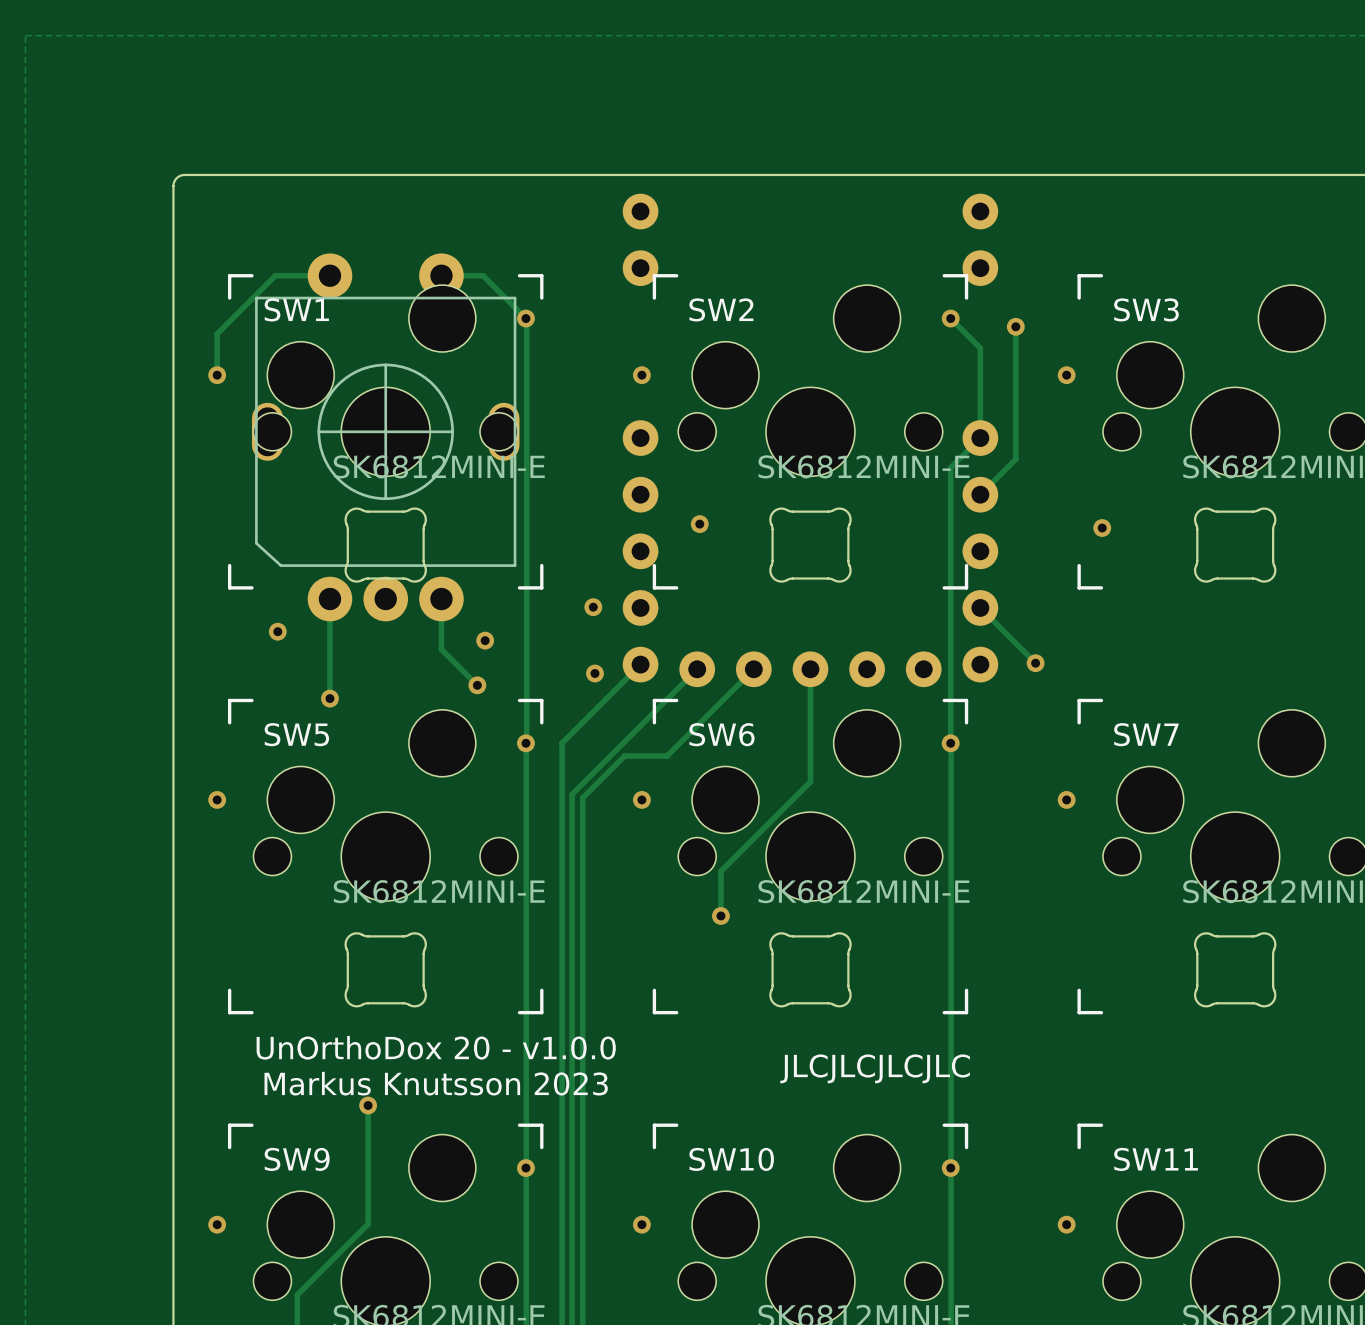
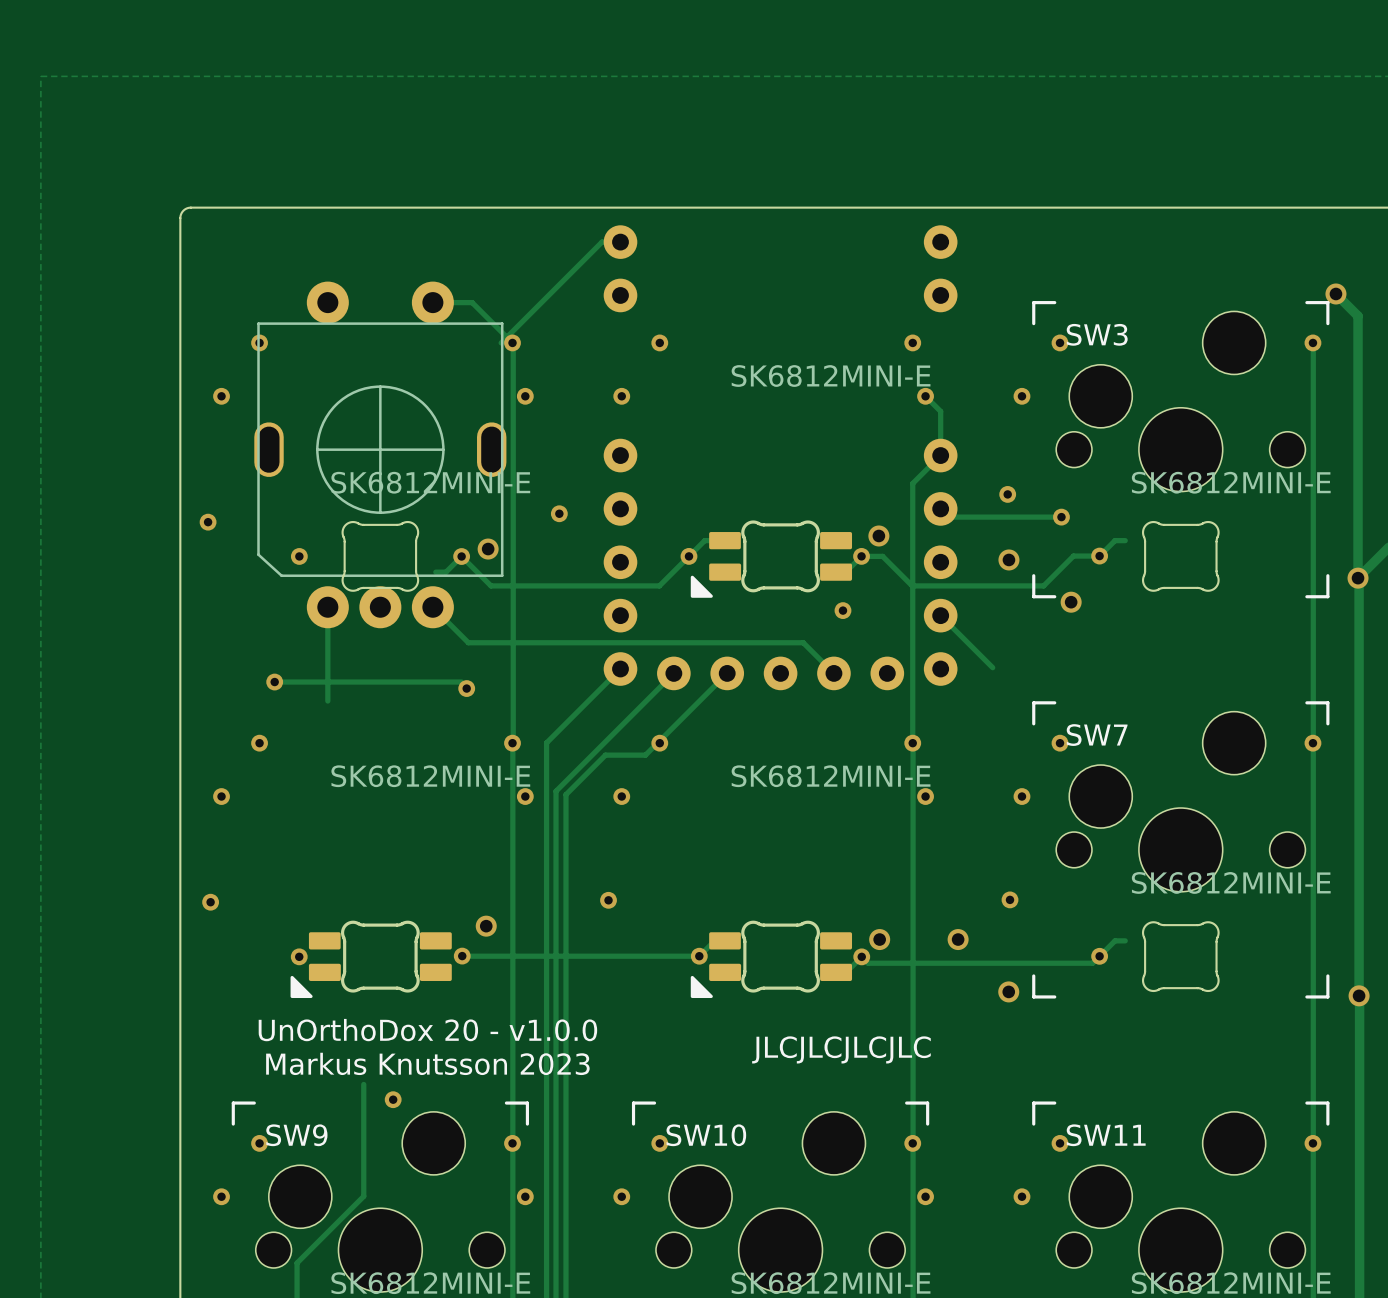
track: none -> (620, 242) (602, 242) (501, 342)
track: (329, 275) (275, 275) (217, 333) (217, 375) -> none
via: none -> (259, 342)
via: none -> (659, 342)
track: (950, 318) (980, 348) (980, 391) -> (925, 396) (940, 411)
via: none -> (1060, 342)
track: (1015, 326) (1015, 459) (980, 494) -> (1061, 517) (948, 517) (940, 508)
via: (1015, 326) -> none
via: none -> (525, 396)
via: none -> (925, 396)
SW1: (385, 431) -> none
SW2: (810, 431) -> none
part value position: SK6812MINI-E (864, 466) -> SK6812MINI-E (831, 376)
via: none -> (1007, 494)
via: none -> (559, 513)
via: none -> (1061, 517)
part footprint: [769, 507, 852, 583] -> [690, 520, 853, 598]
via: none -> (208, 522)
via: none -> (878, 535)
via position: (699, 524) -> (688, 556)
track: none -> (725, 540) (704, 540) (659, 585) (491, 585) (461, 556) (445, 572) (435, 572)
via: (1102, 528) -> none
track: none -> (1125, 540) (1115, 540) (1099, 556) (1073, 556) (1043, 585) (912, 585) (882, 556) (861, 556) (845, 572) (836, 572)
via: none -> (488, 549)
via: none -> (1099, 556)
via: none -> (299, 556)
via: none -> (461, 556)
via: none -> (861, 556)
via: none -> (1008, 559)
via: none -> (1071, 602)
track: (441, 599) (441, 649) (477, 685) -> (432, 607) (468, 642) (803, 642) (833, 673)
via: none -> (842, 610)
via: (593, 607) -> none
via: (277, 631) -> none
via: (485, 640) -> none
via: (1035, 663) -> none
track: (810, 669) (810, 781) (720, 871) (720, 915) -> none
via: (594, 673) -> none
track: none -> (274, 682) (461, 682)
via: none -> (274, 682)
via: (329, 698) -> none
via: none -> (259, 743)
via: none -> (659, 743)
via: none -> (1060, 743)
via: none -> (525, 796)
via: none -> (925, 796)
SW5: (385, 856) -> none
SW6: (810, 856) -> none
part value position: SK6812MINI-E (439, 891) -> SK6812MINI-E (430, 776)
part value position: SK6812MINI-E (864, 891) -> SK6812MINI-E (831, 776)
via: none -> (1010, 899)
via: none -> (608, 900)
via: none -> (210, 902)
via: (720, 915) -> none
part footprint: [344, 932, 427, 1008] -> [290, 920, 452, 999]
part footprint: [769, 932, 852, 1008] -> [690, 920, 853, 999]
via: none -> (486, 926)
via: none -> (879, 939)
via: none -> (958, 939)
track: none -> (725, 940) (714, 940) (699, 956) (462, 956)
track: none -> (1125, 940) (1115, 940) (1092, 963) (868, 963) (861, 956) (846, 972) (836, 972)
via: none -> (462, 956)
via: none -> (699, 956)
via: none -> (1099, 956)
via: none -> (299, 956)
via: none -> (861, 956)
via: none -> (1008, 991)
via position: (368, 1105) -> (393, 1099)
via: none -> (259, 1143)
via: none -> (659, 1143)
via: none -> (1060, 1143)
via: none -> (525, 1196)
via: none -> (925, 1196)

